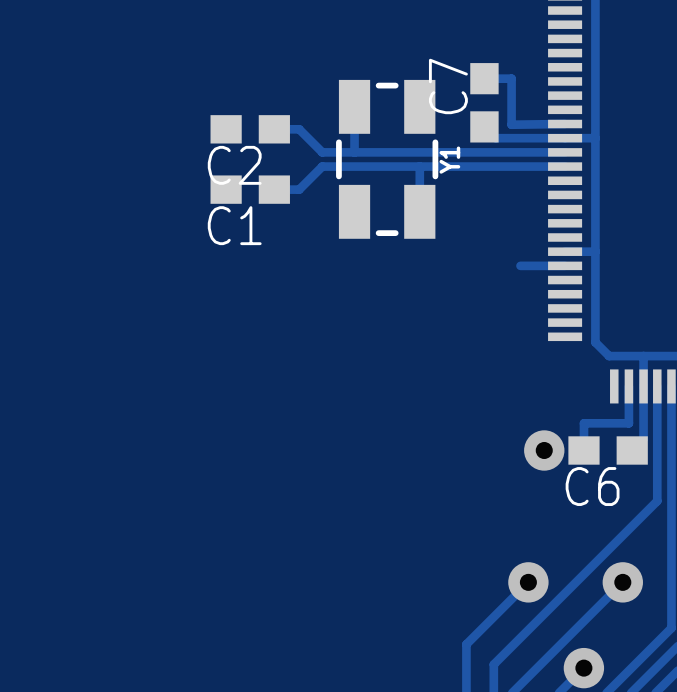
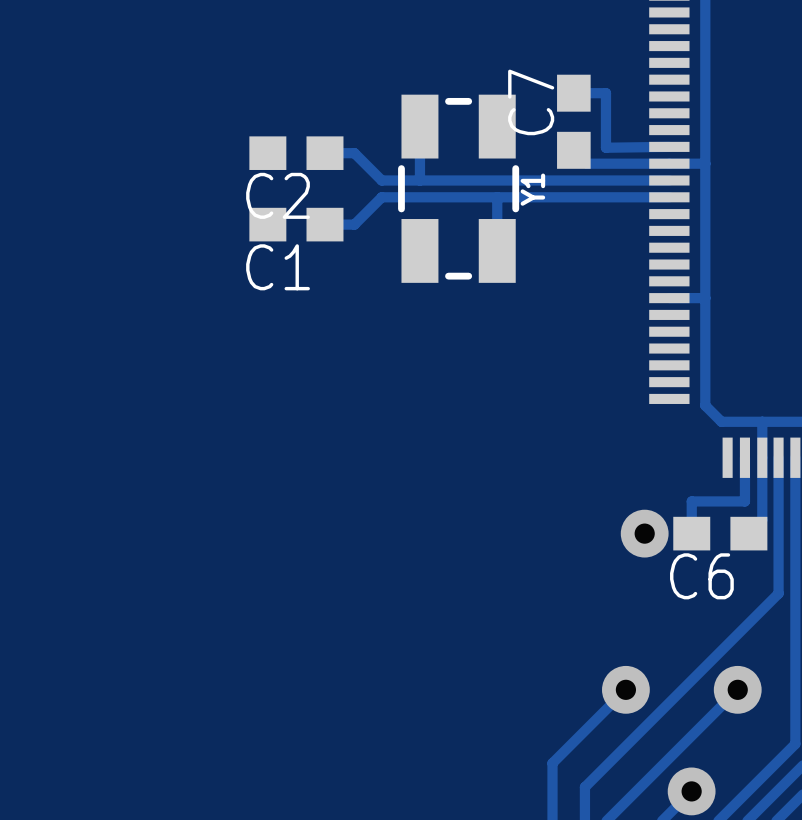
track: (520, 265) (565, 265) -> none

